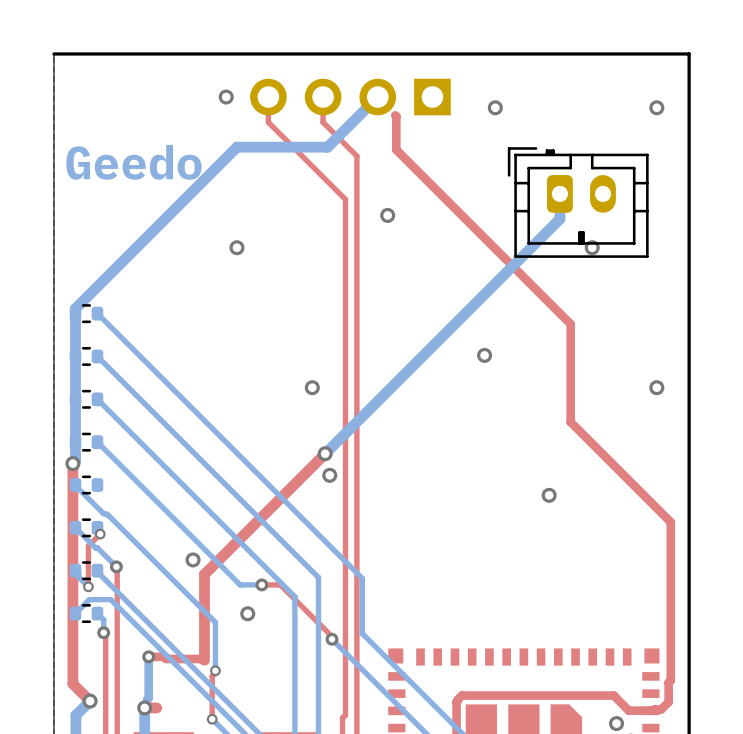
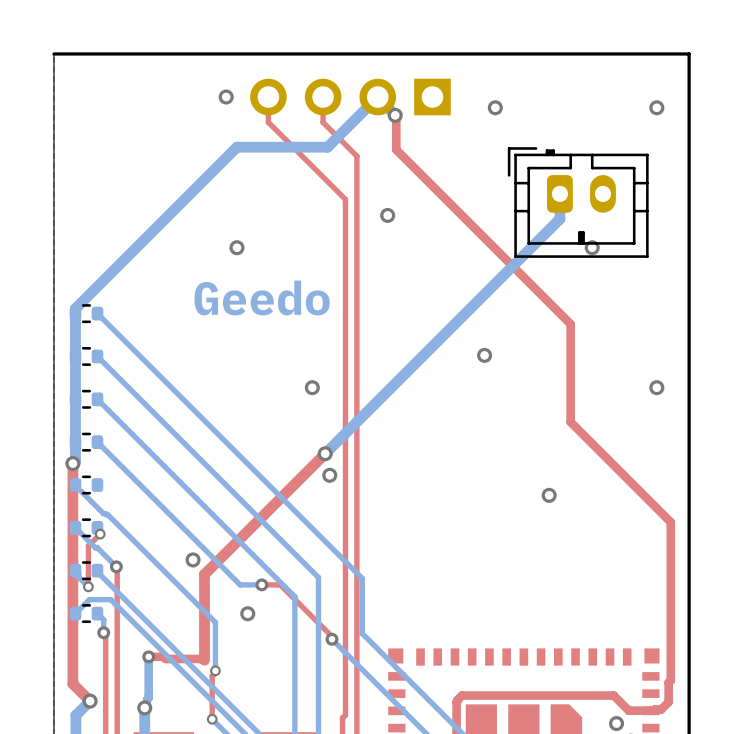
via: none -> (395, 115)
text position: Geedo (134, 162) -> Geedo (262, 297)
top track: (156, 707) (144, 707) -> none

